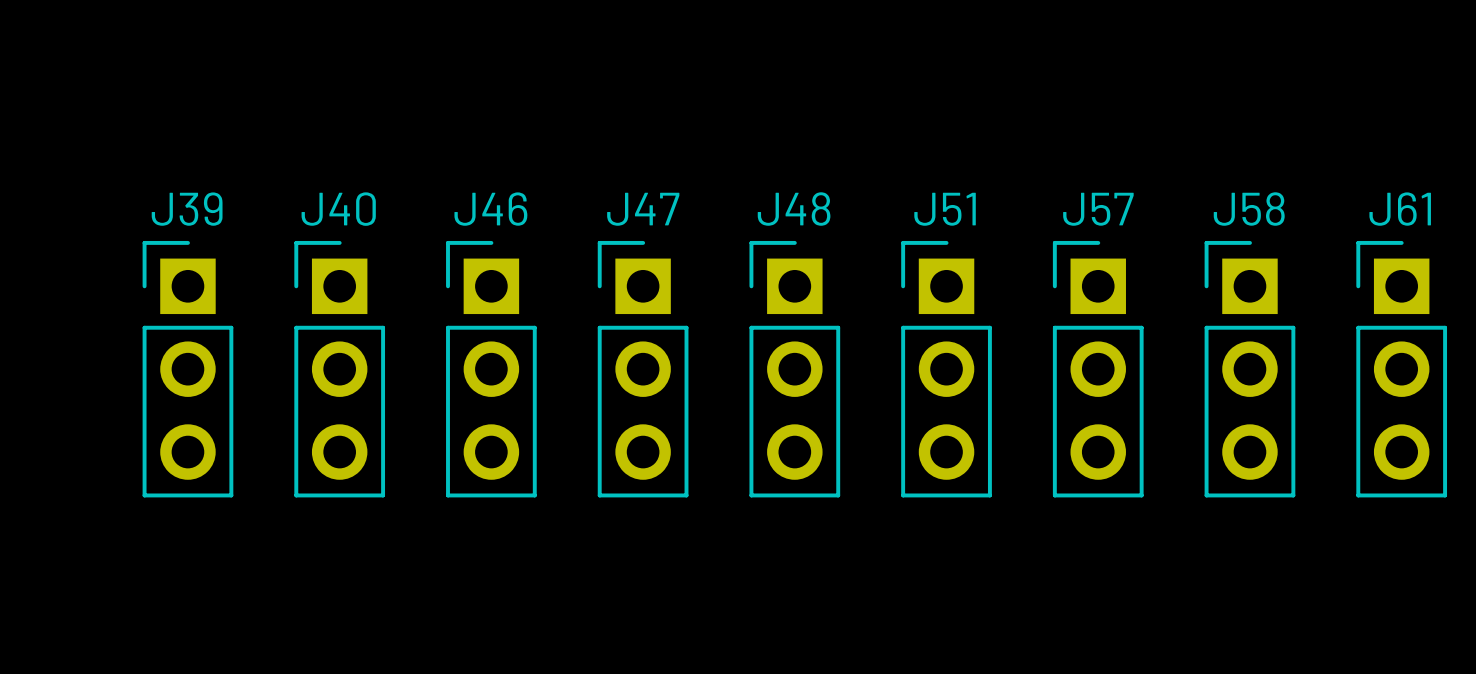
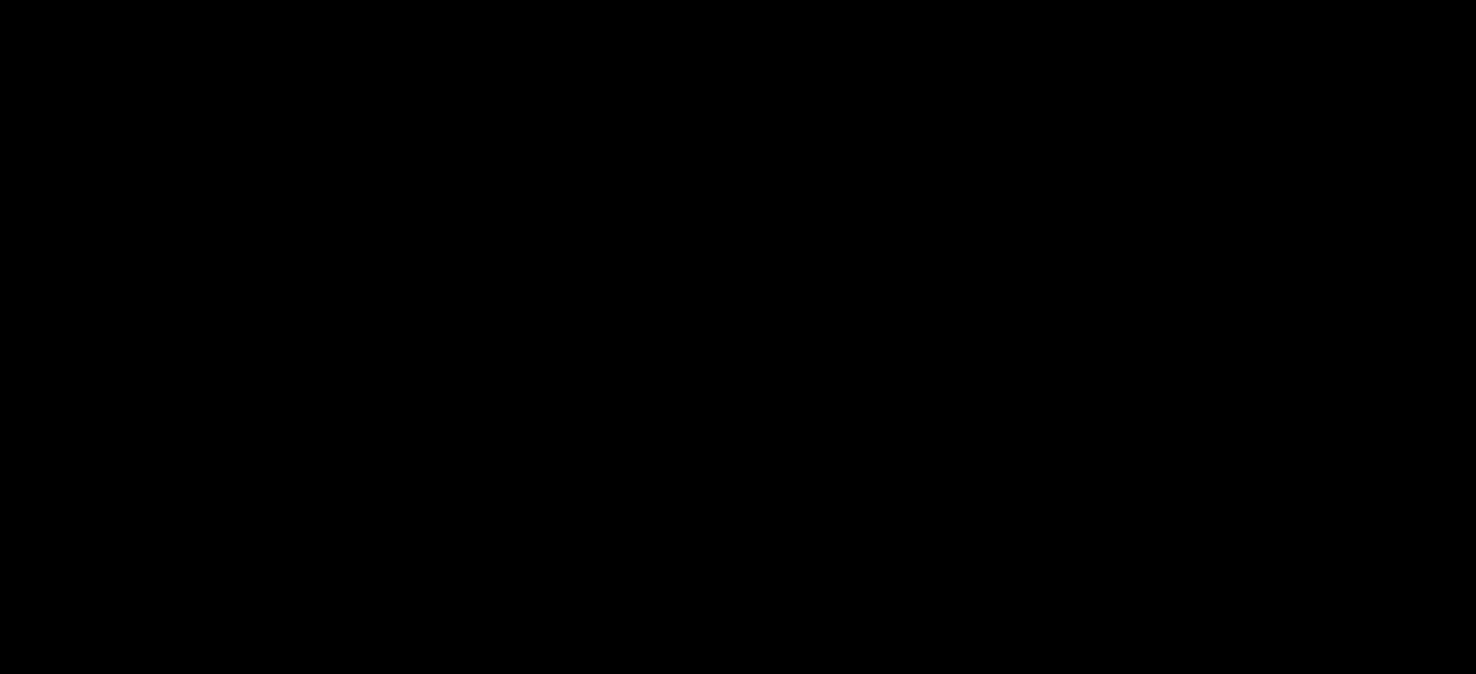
J39: (187, 369) -> none
J40: (339, 369) -> none
J46: (491, 369) -> none
J47: (643, 369) -> none
J48: (794, 369) -> none
J51: (946, 369) -> none
J57: (1098, 369) -> none
J58: (1249, 369) -> none
J61: (1401, 369) -> none

